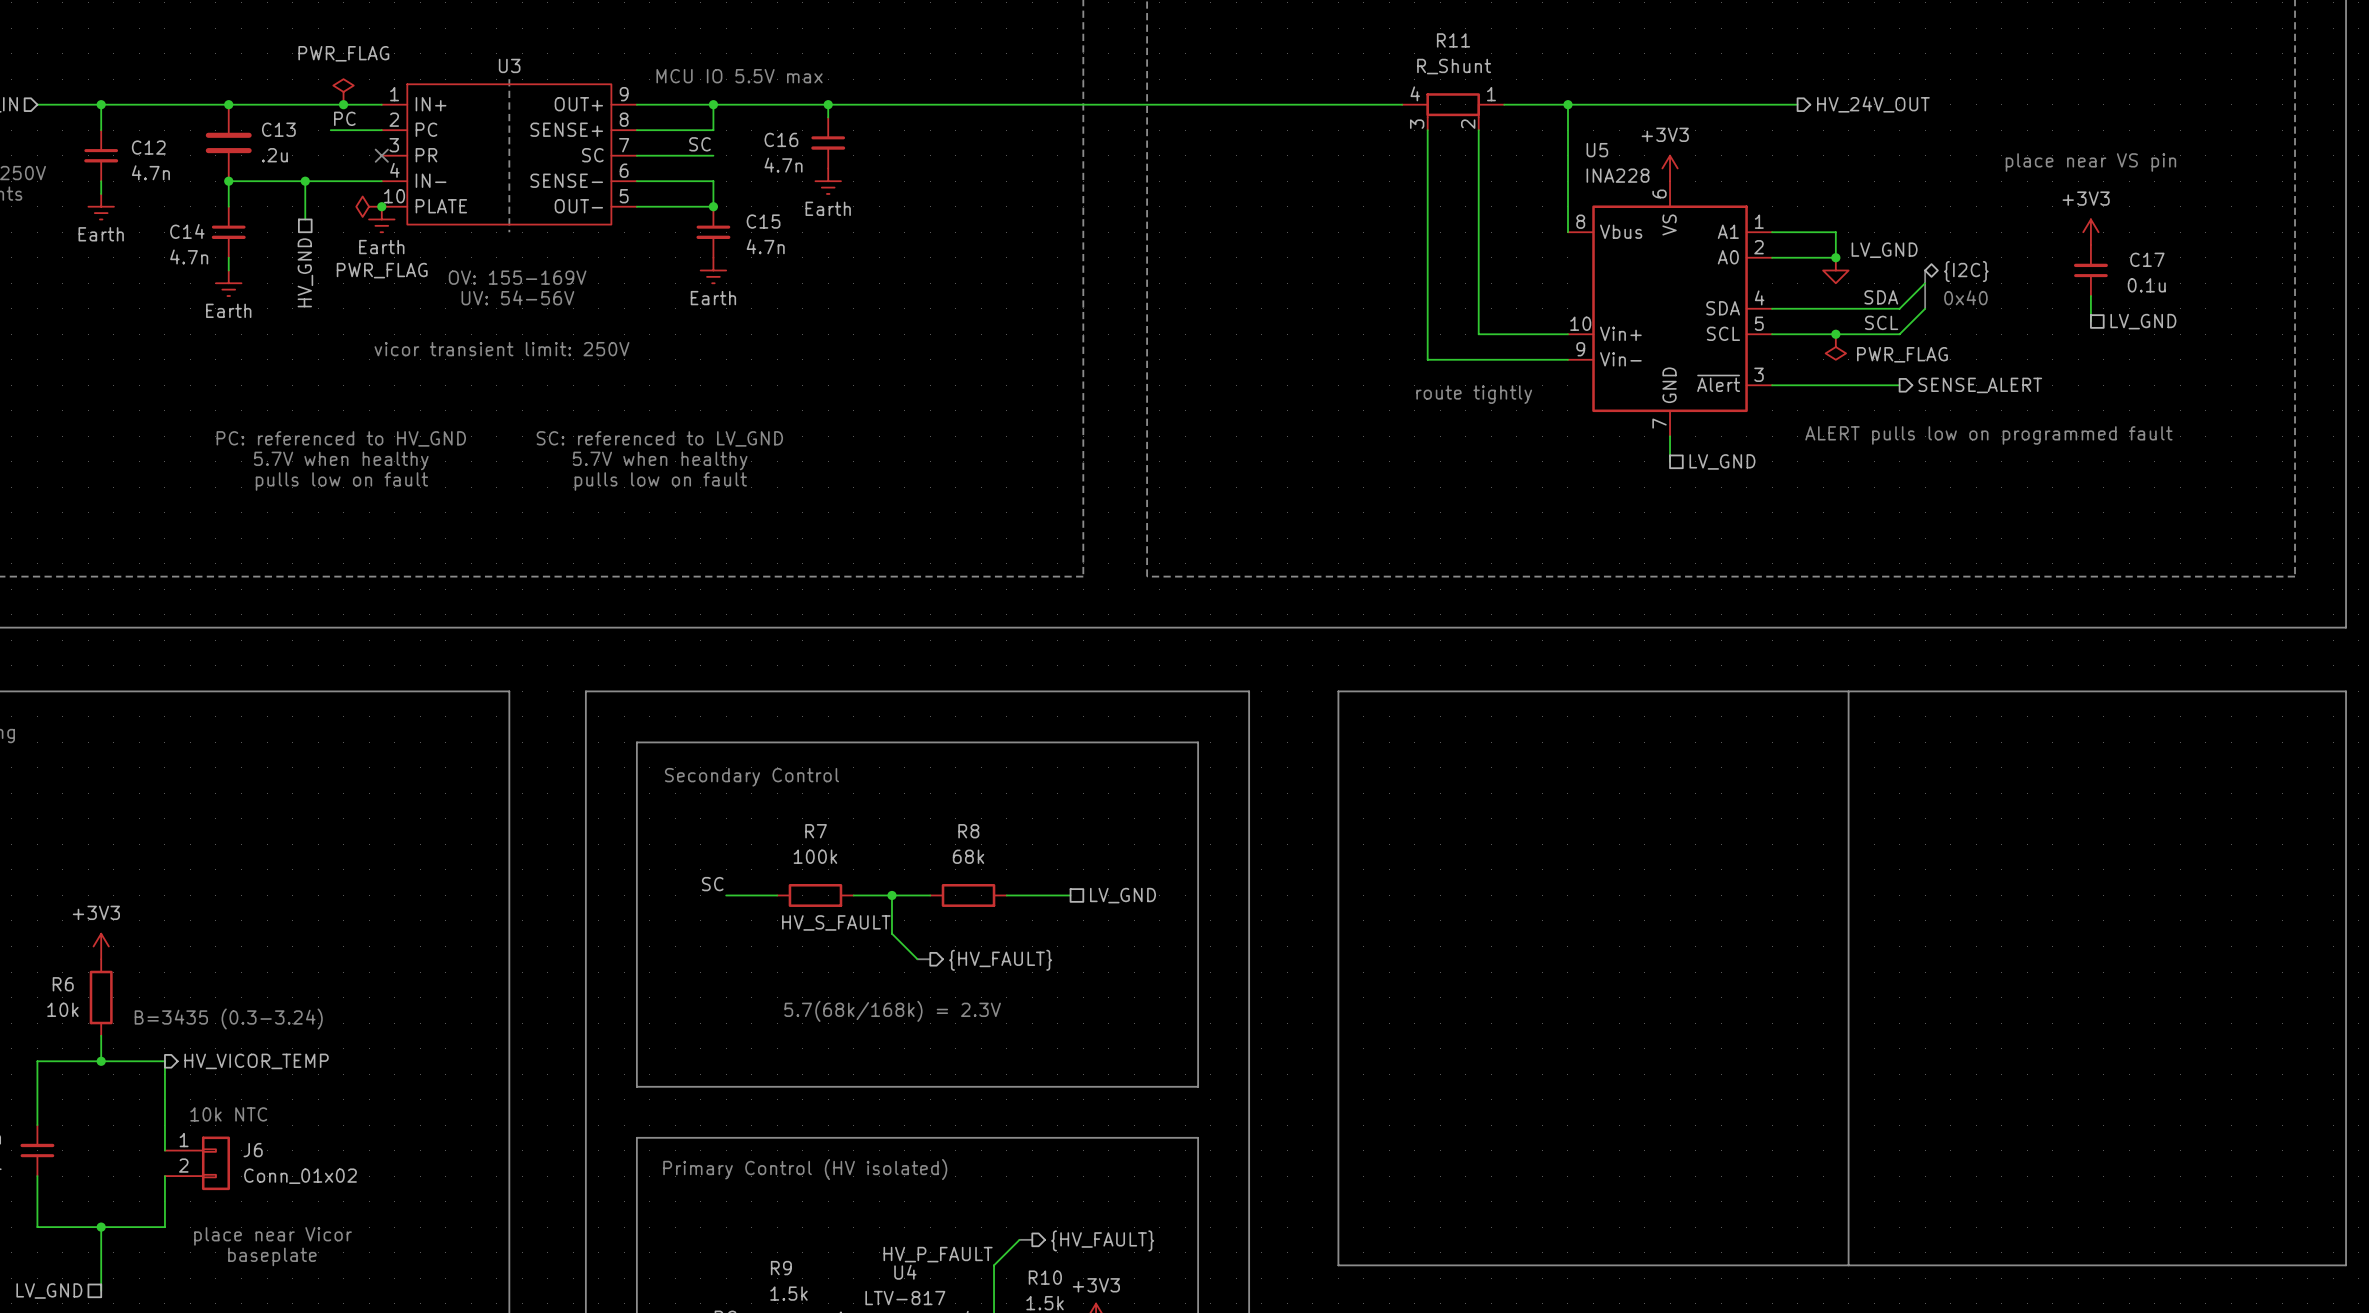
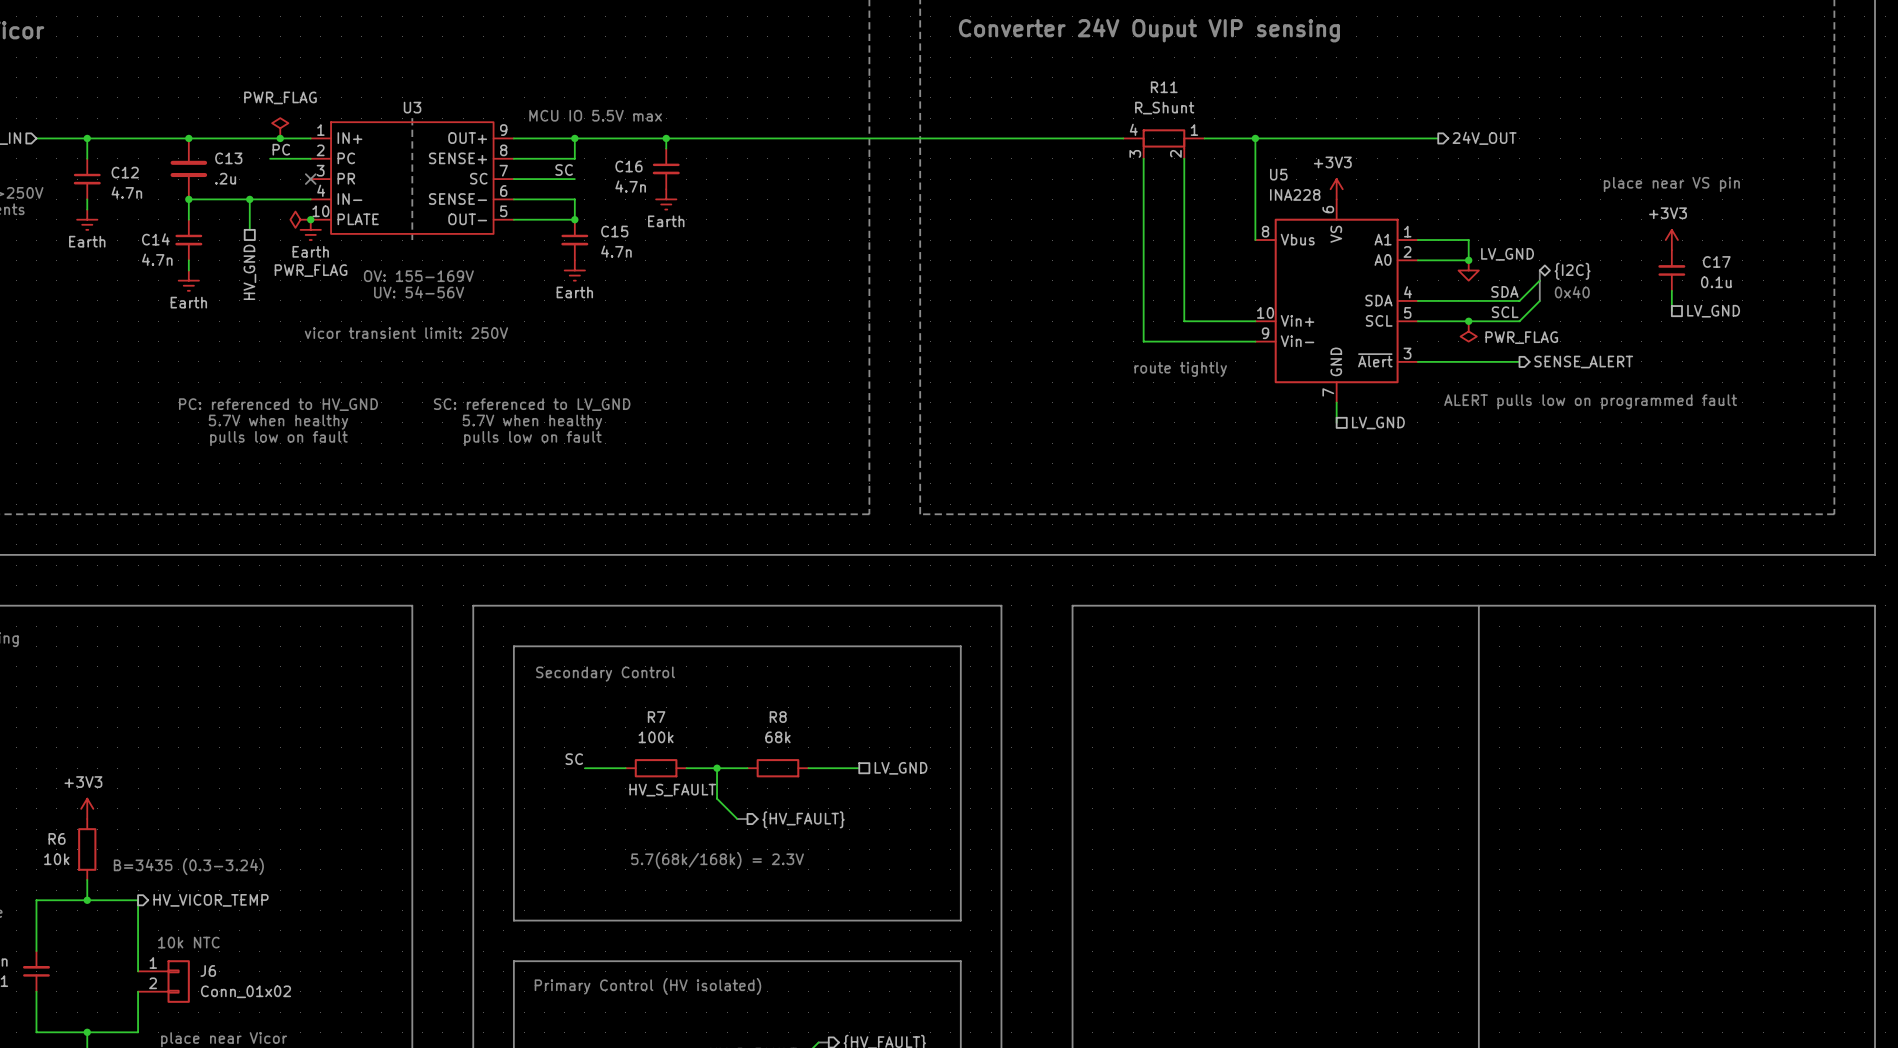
hierarchical label: HV_24V_OUT (1873, 104) -> 24V_OUT (1484, 138)

